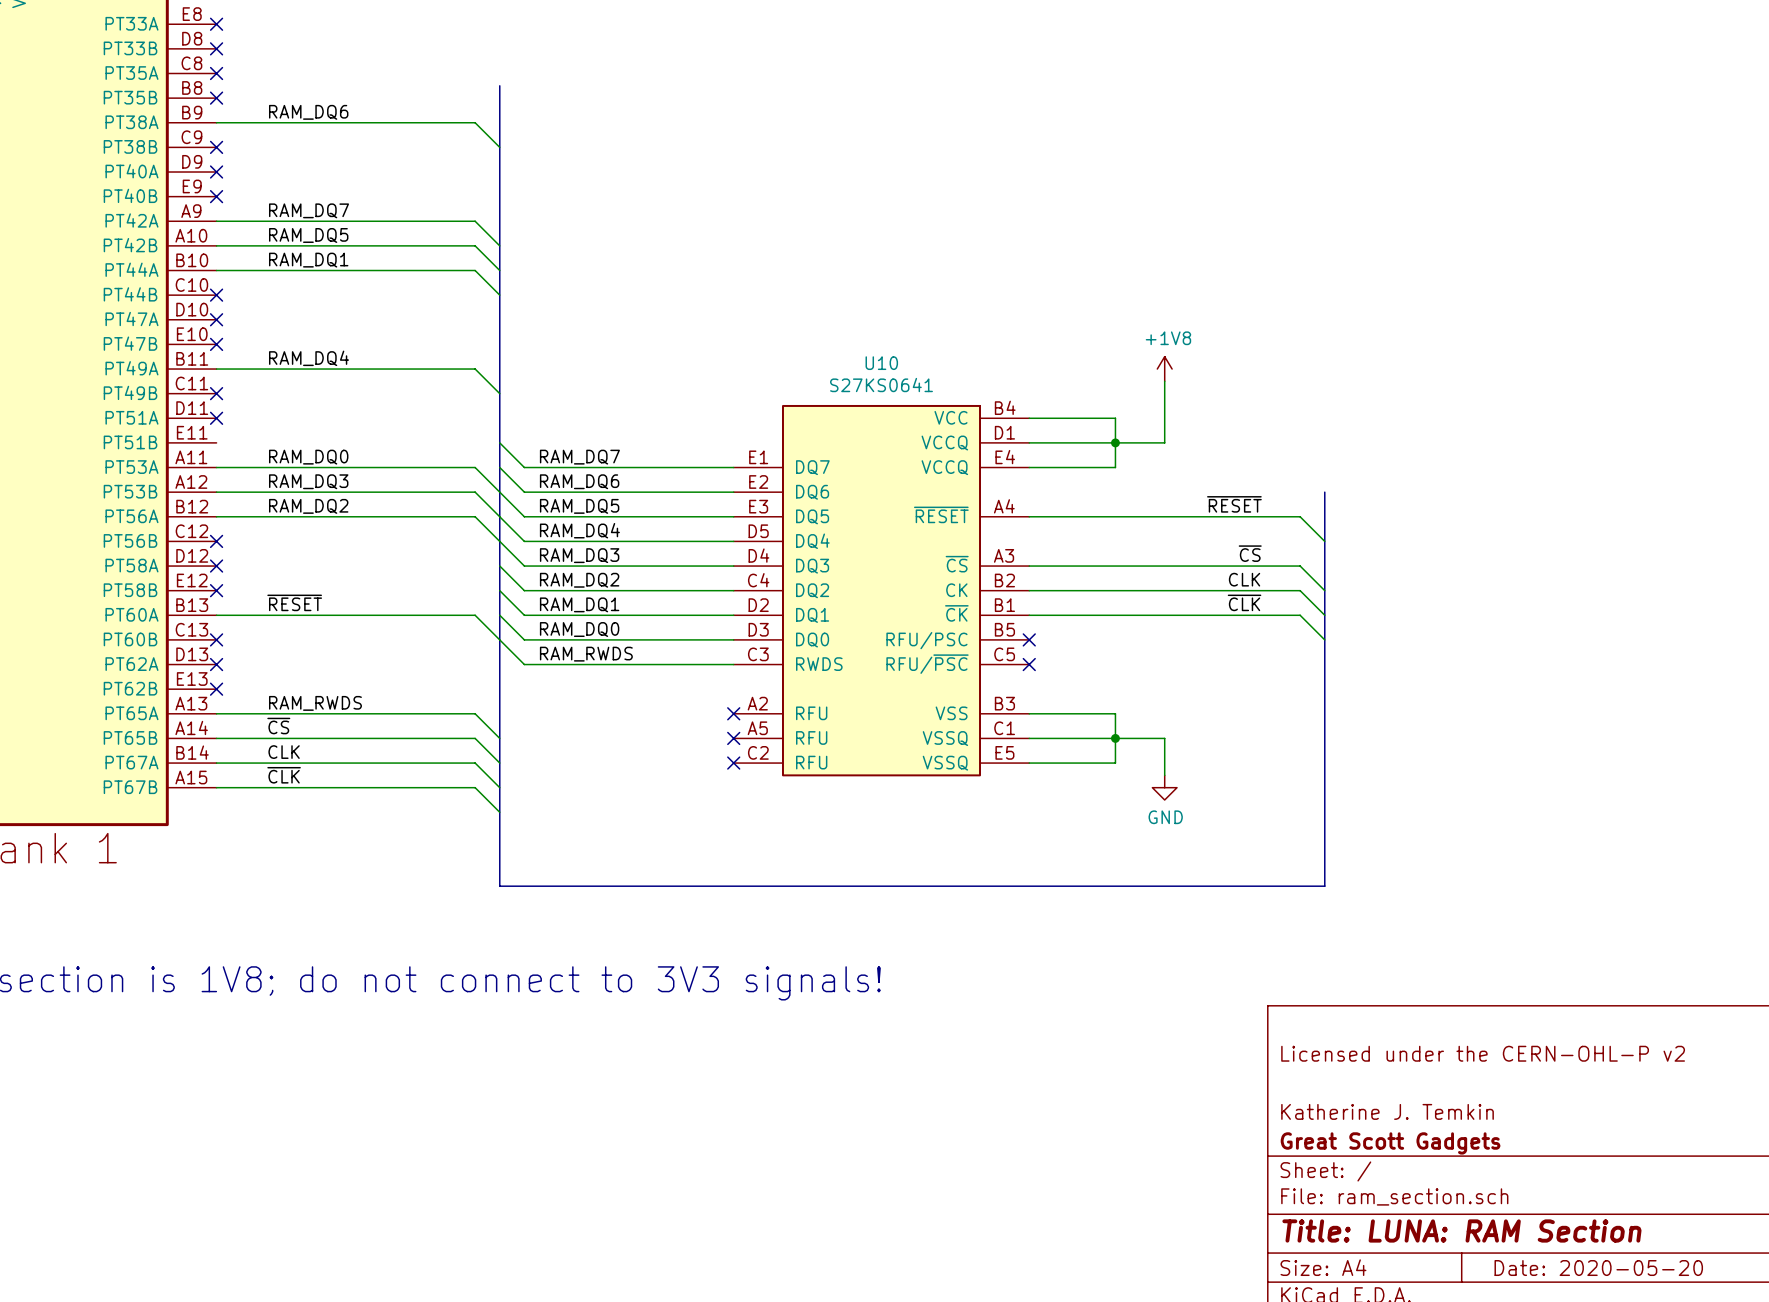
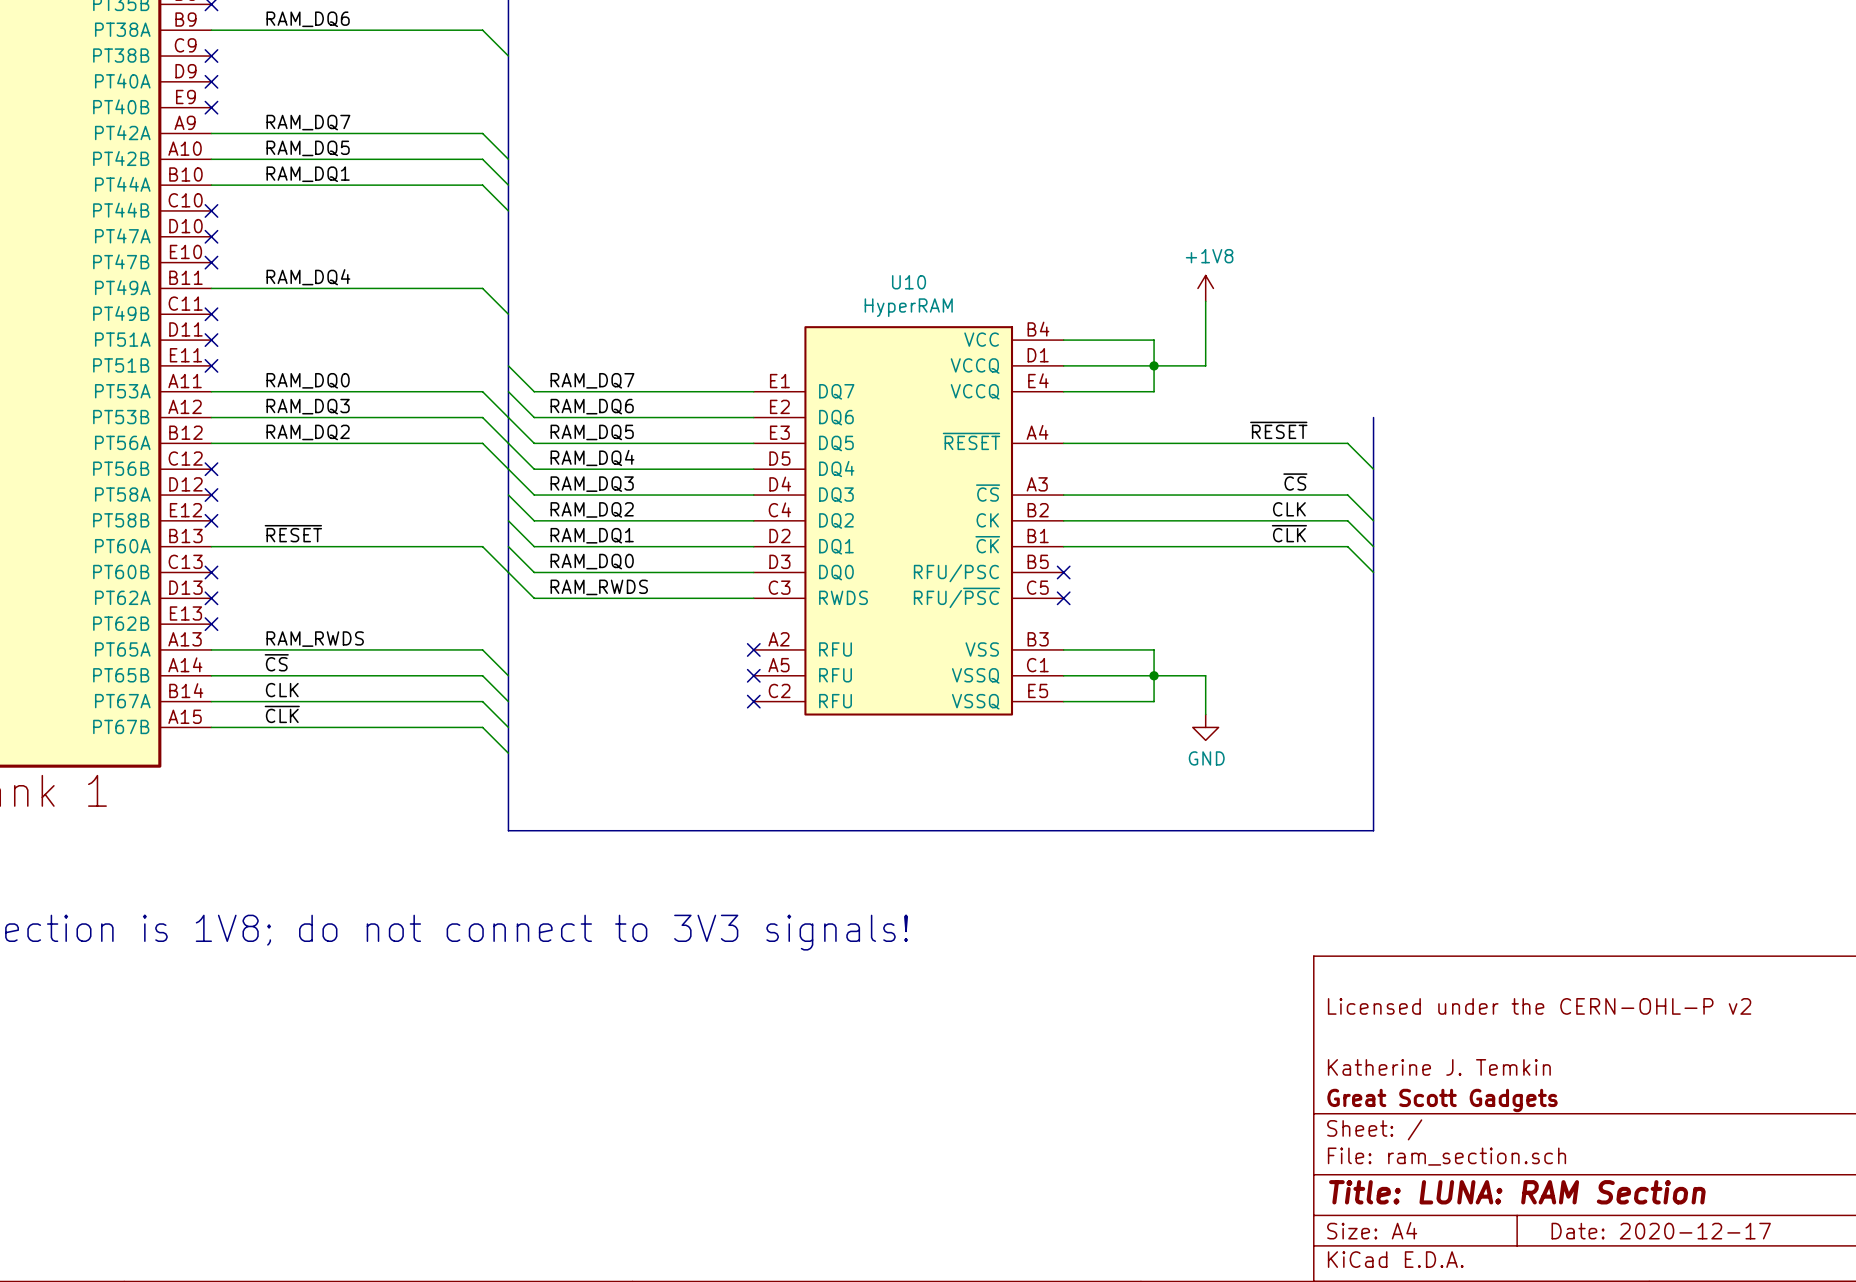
U10 value: S27KS0641 (881, 385) -> HyperRAM (908, 307)
no-connect mark: none -> (211, 365)
title block: Date: 2020-05-20 (1598, 1268) -> Date: 2020-12-17 (1661, 1231)

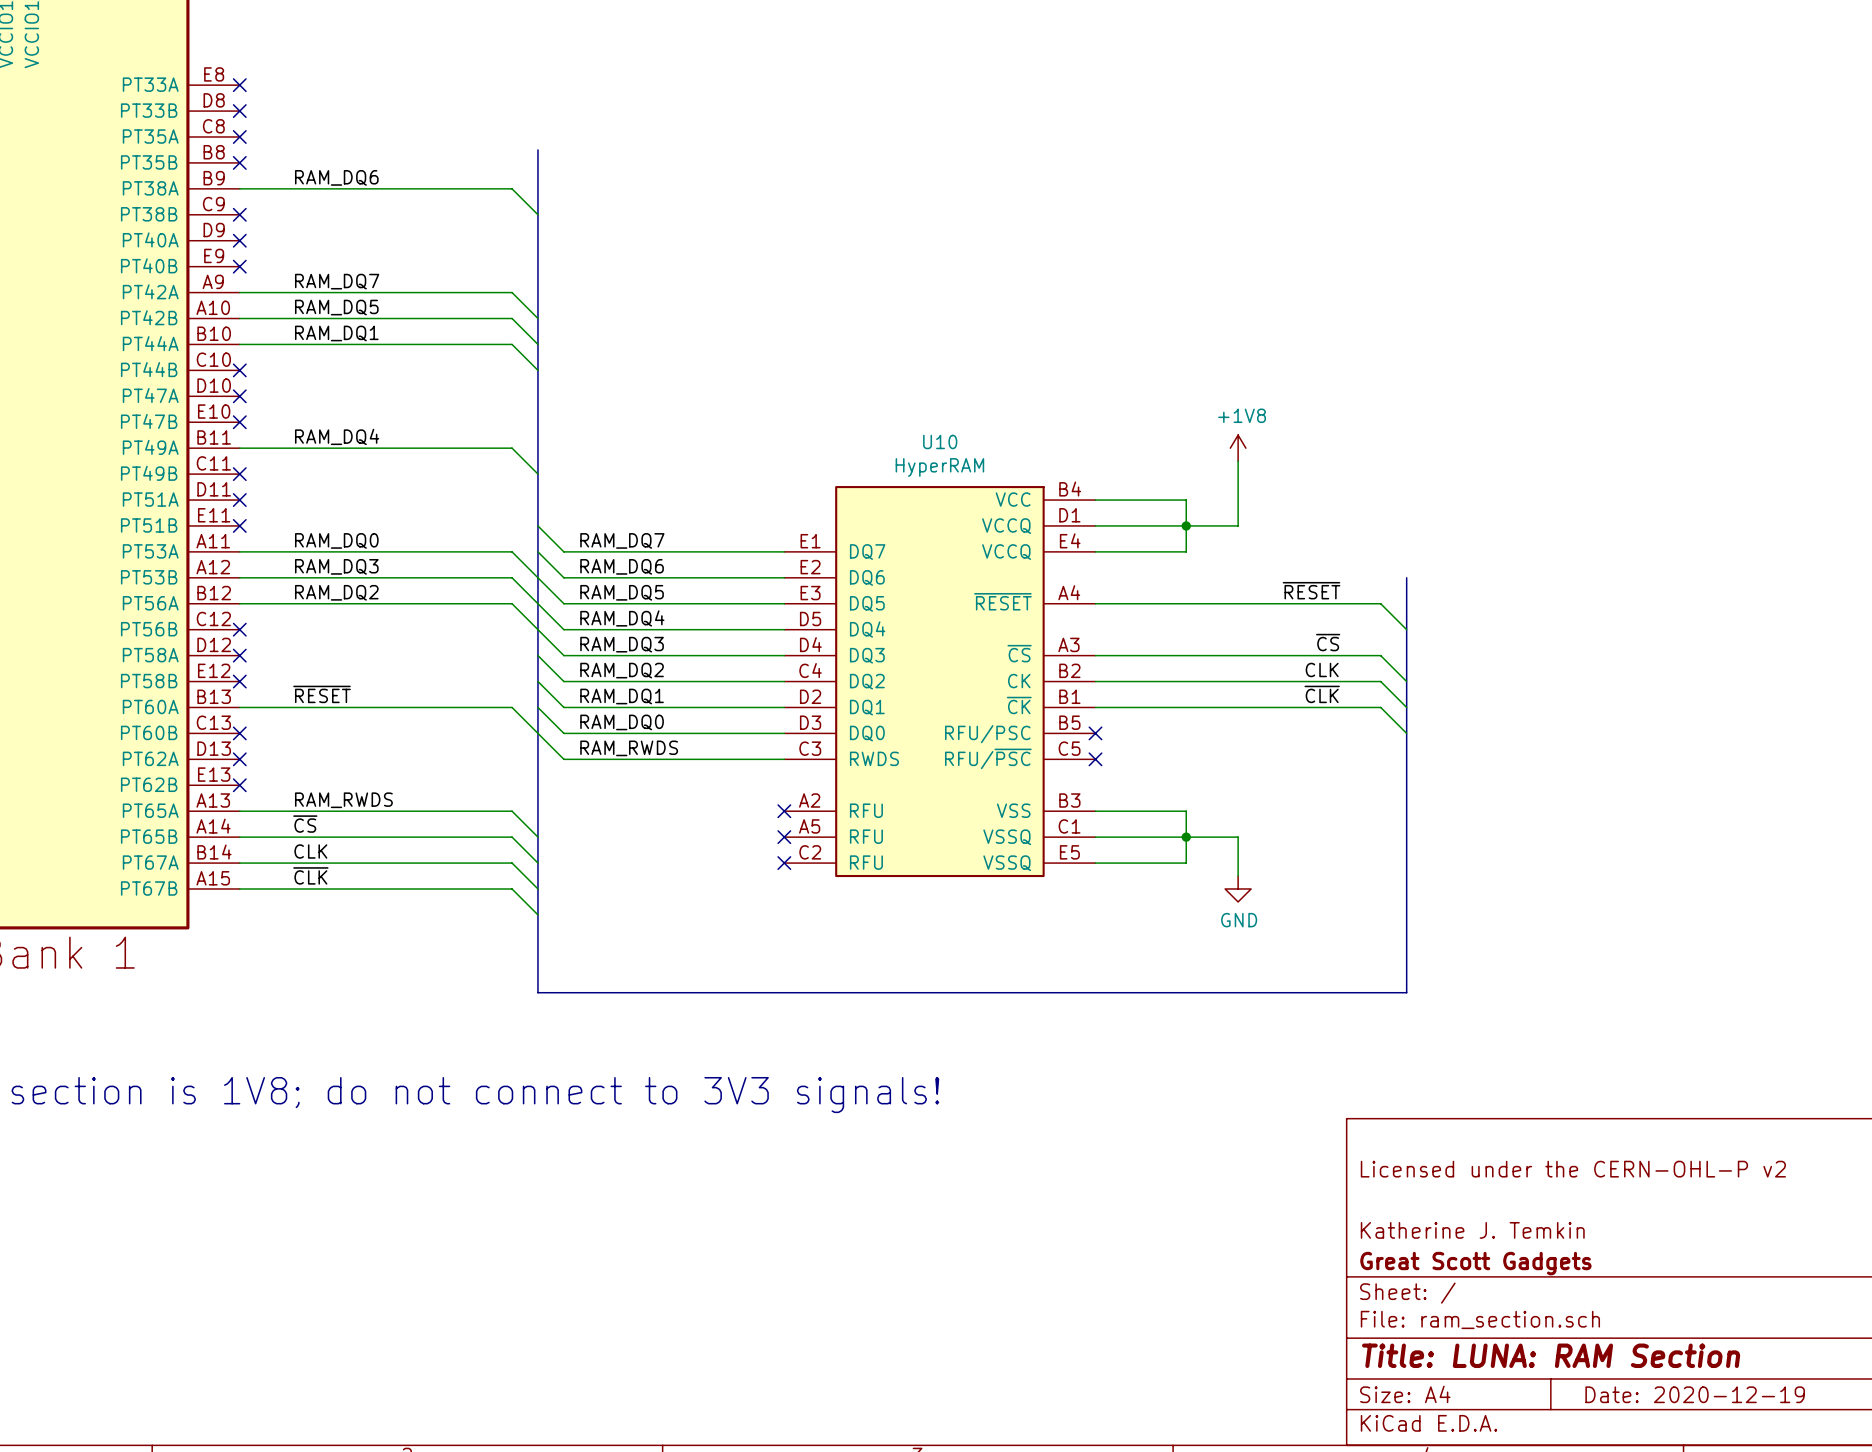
title block: Date: 2020-12-17 (1661, 1231) -> Date: 2020-12-19 (1695, 1394)

